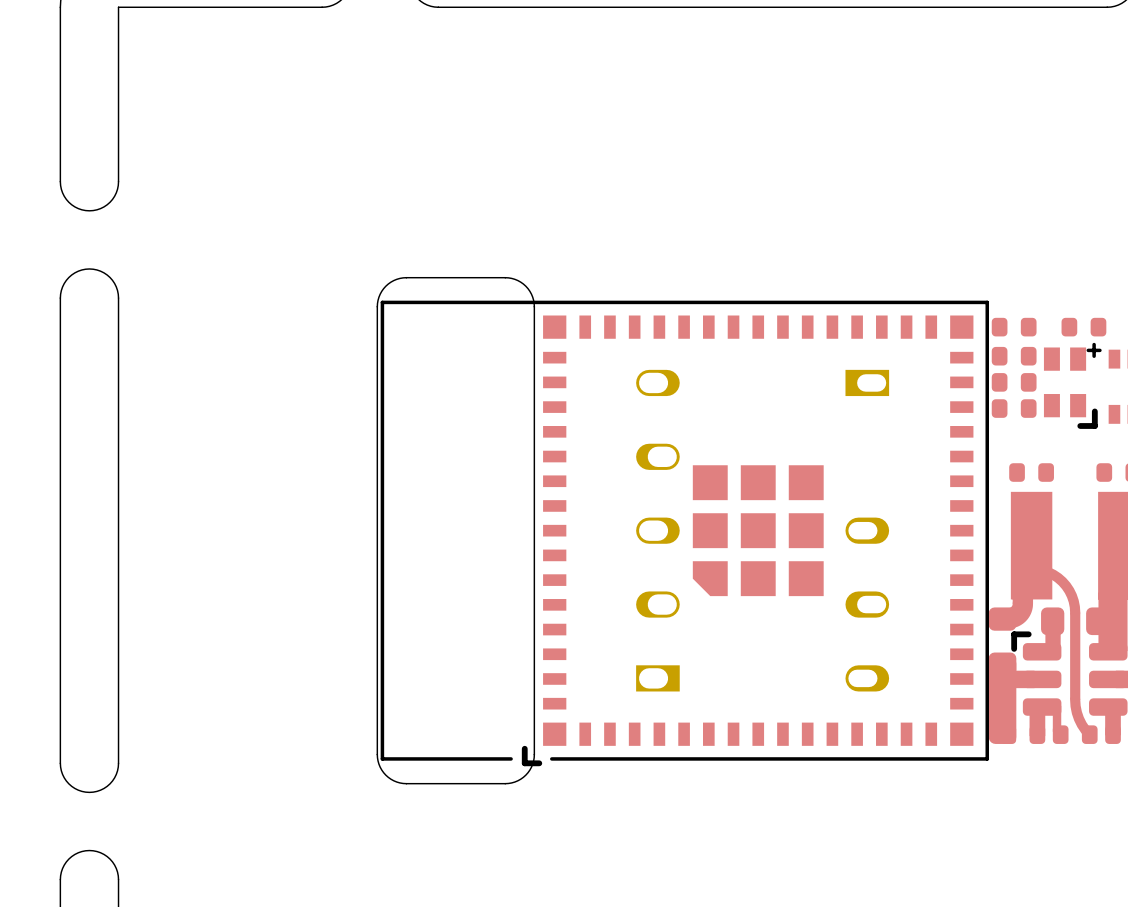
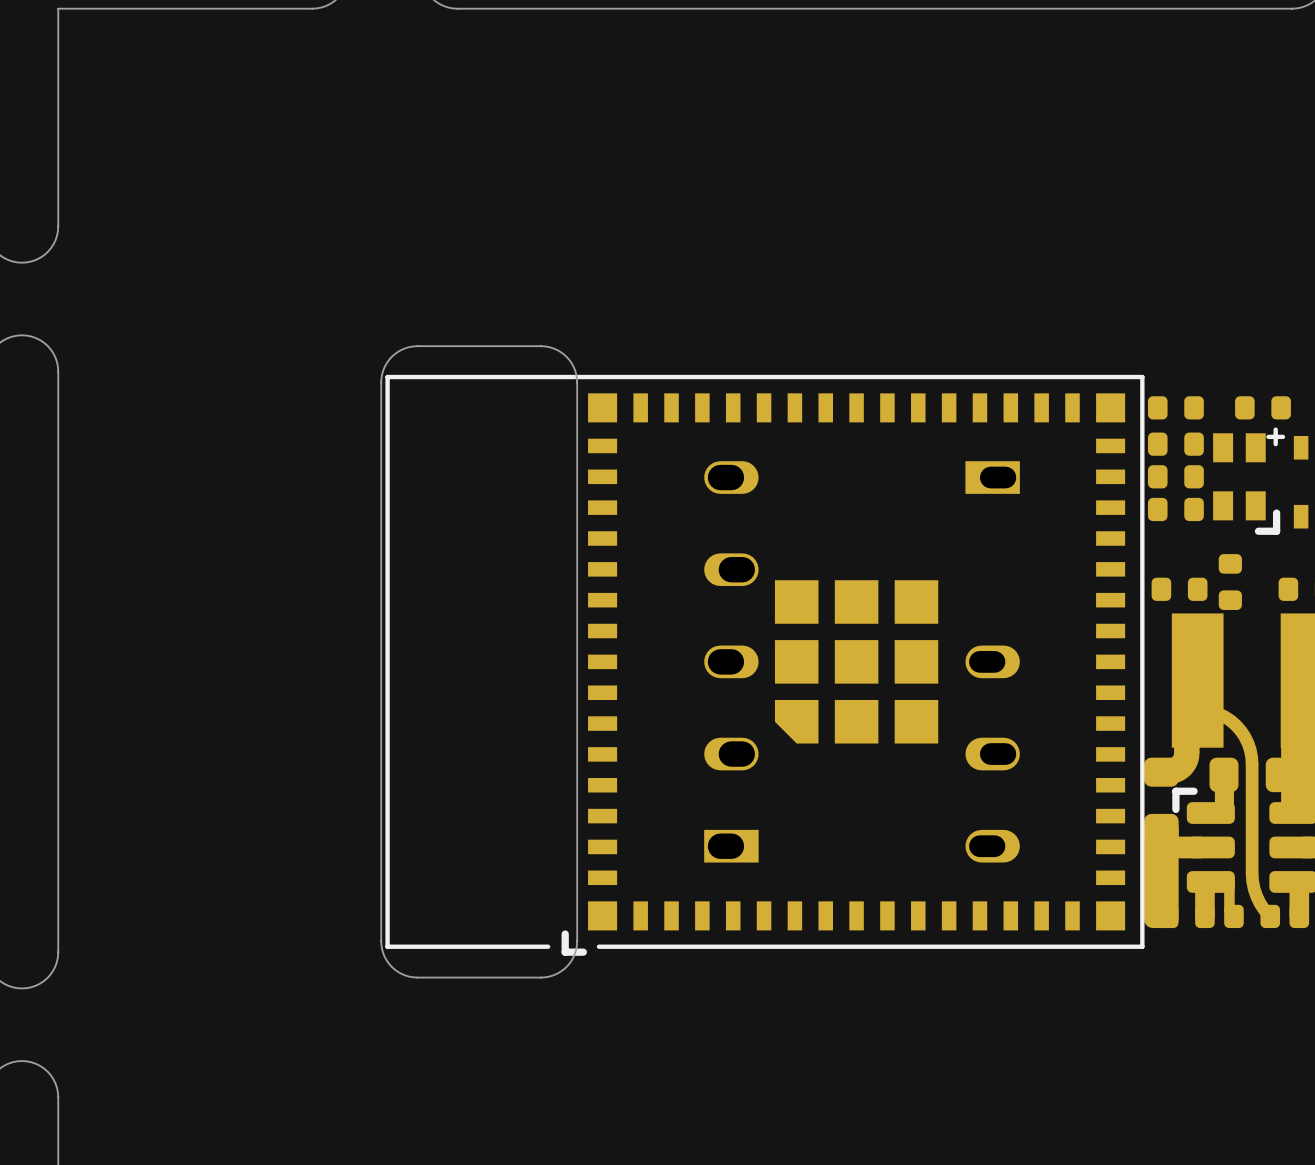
part: none -> (1230, 582)
part: none -> (1179, 589)
part: (1031, 472) -> none

